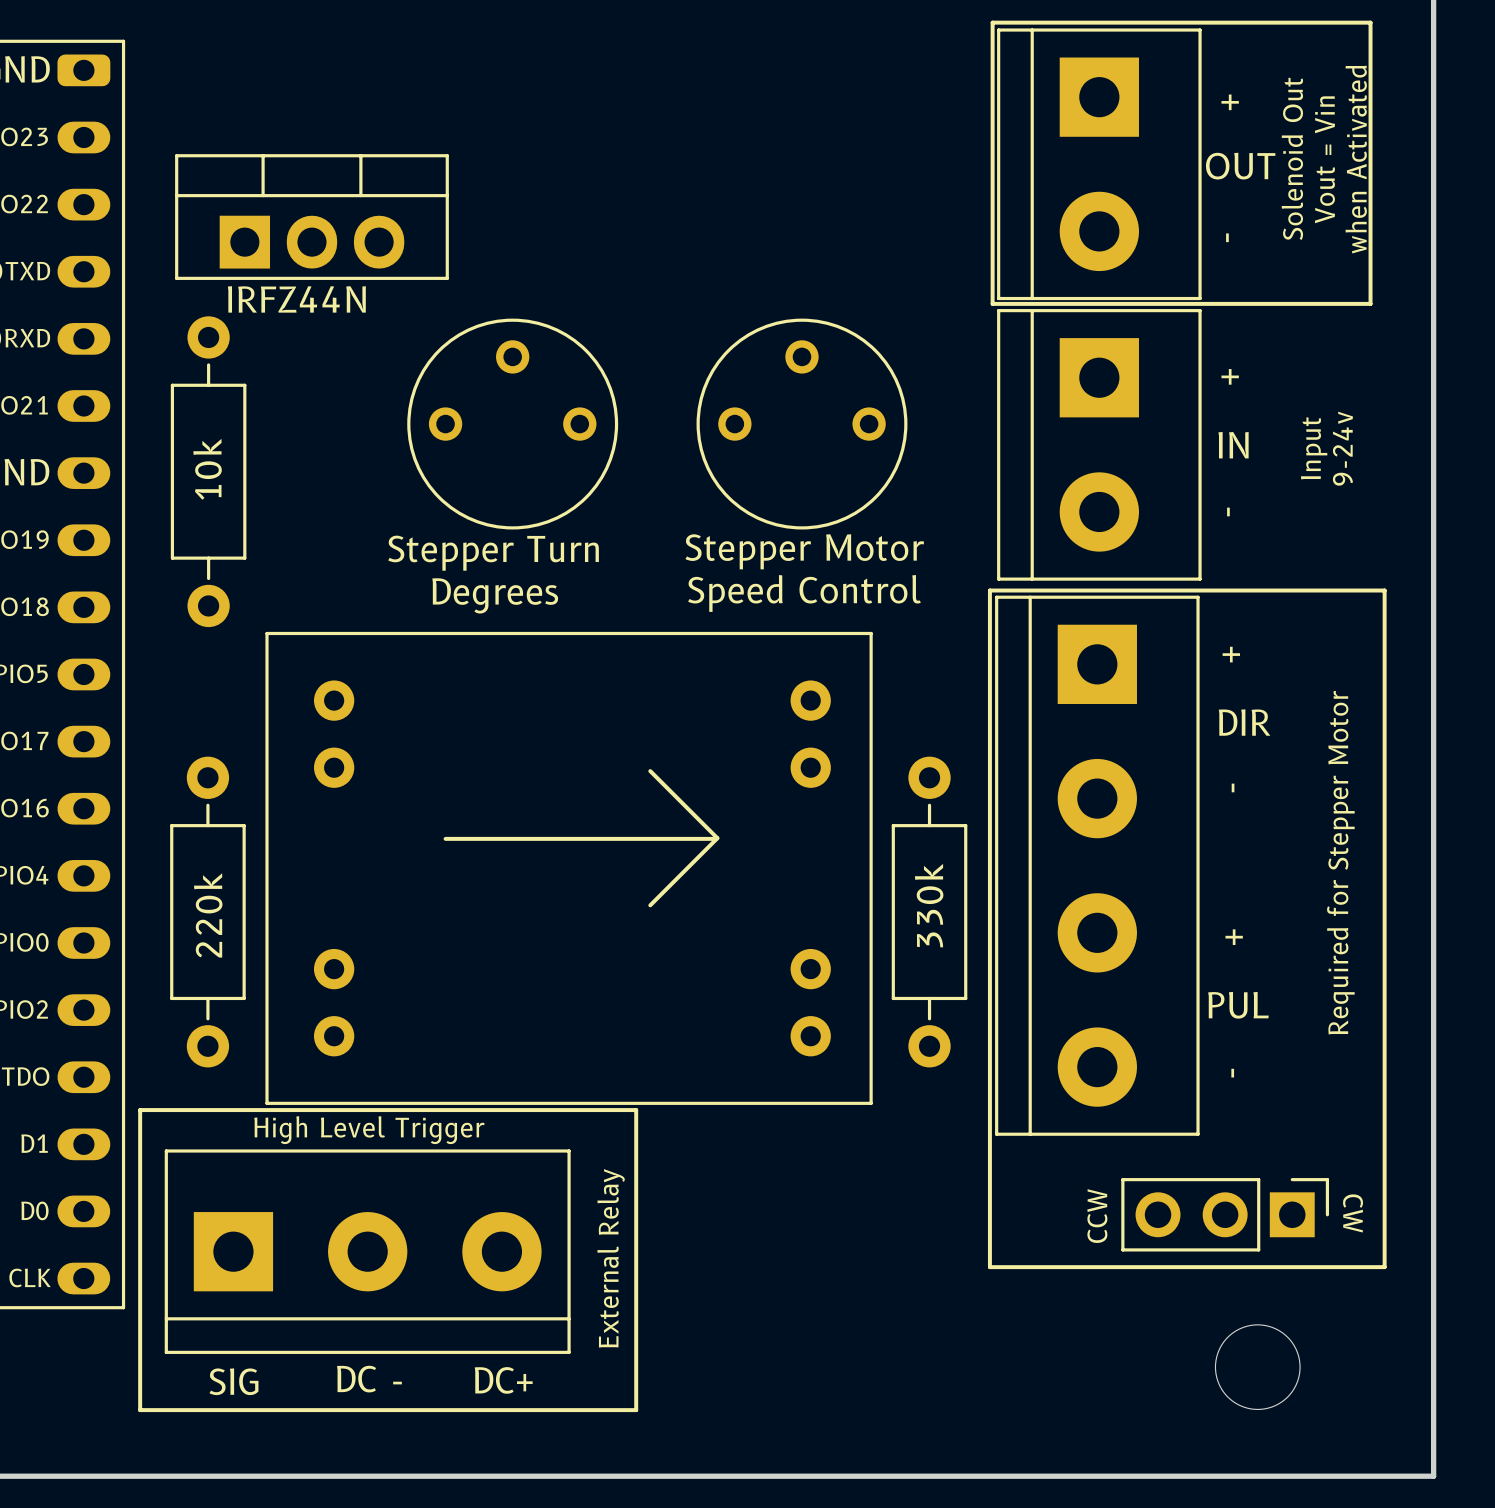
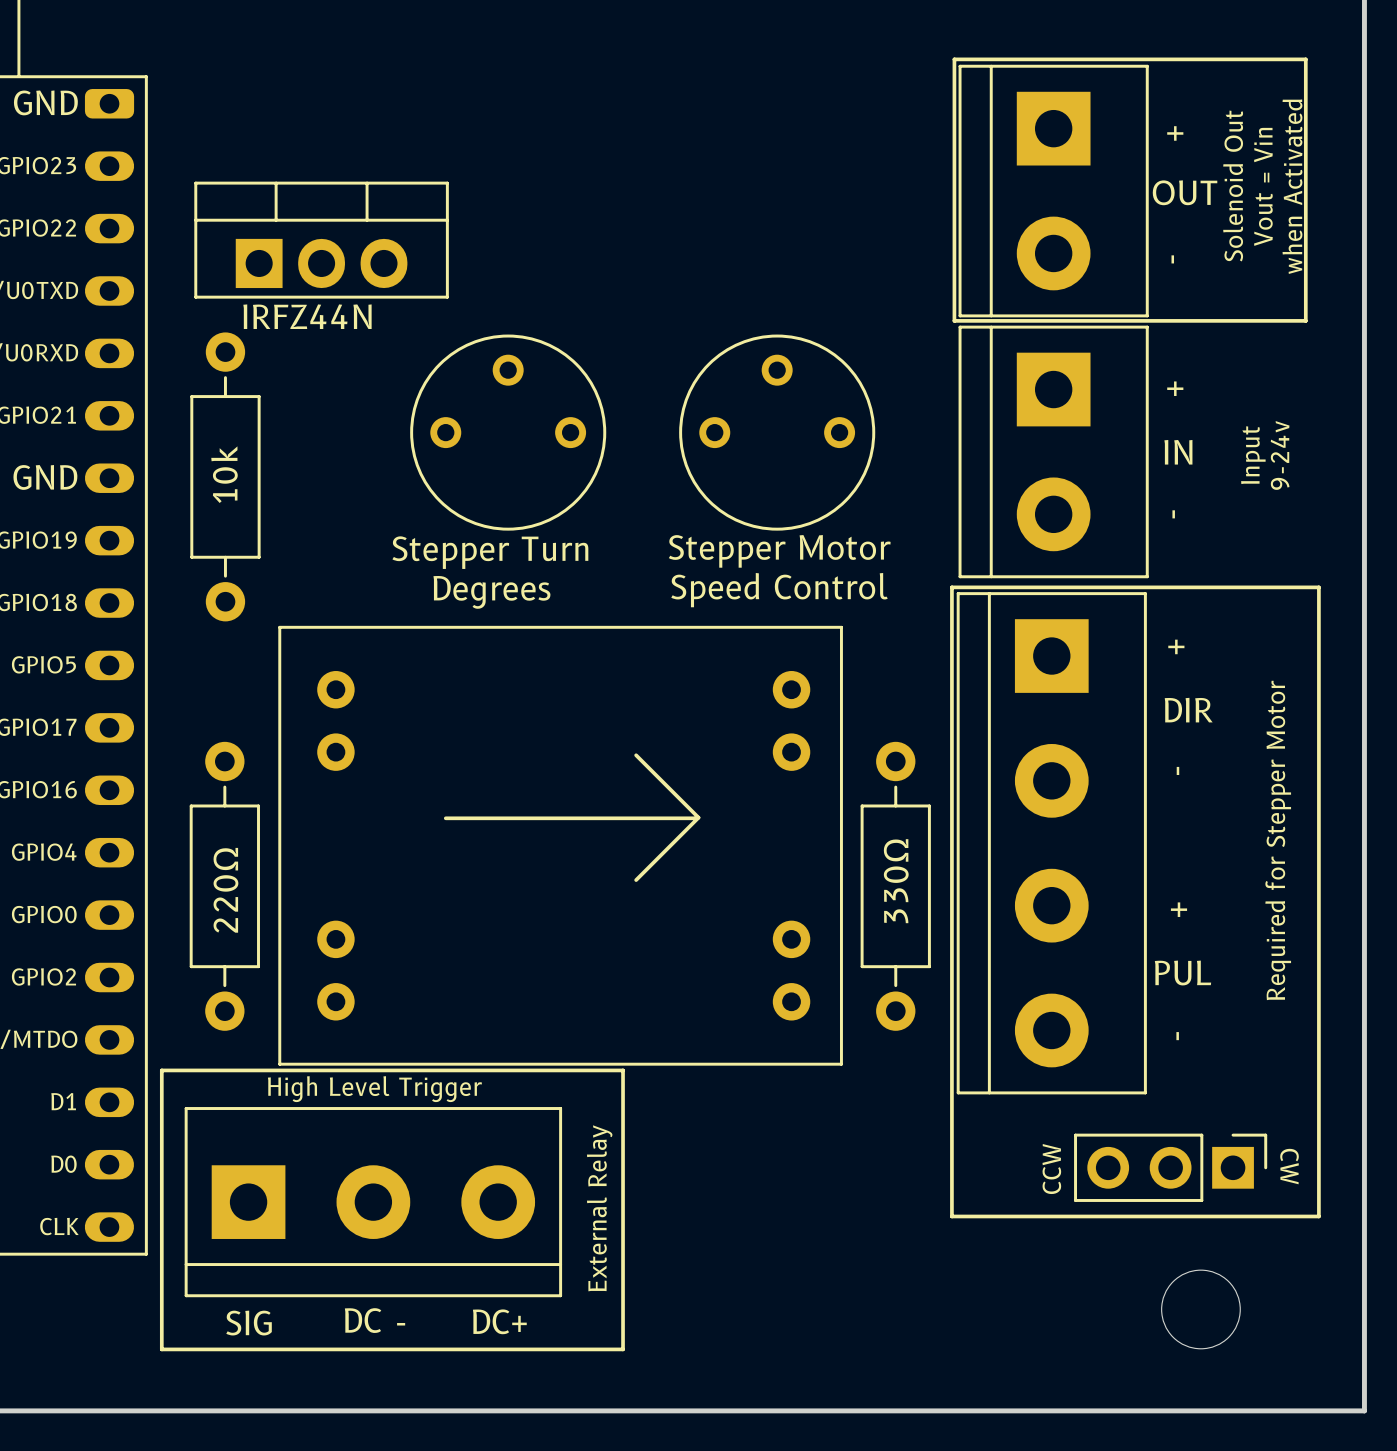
part footprint: [265, 631, 873, 1105] -> [278, 625, 843, 1066]
part value: 330k (929, 905) -> 330Ω (896, 881)
part value: 220k (208, 915) -> 220Ω (225, 890)

